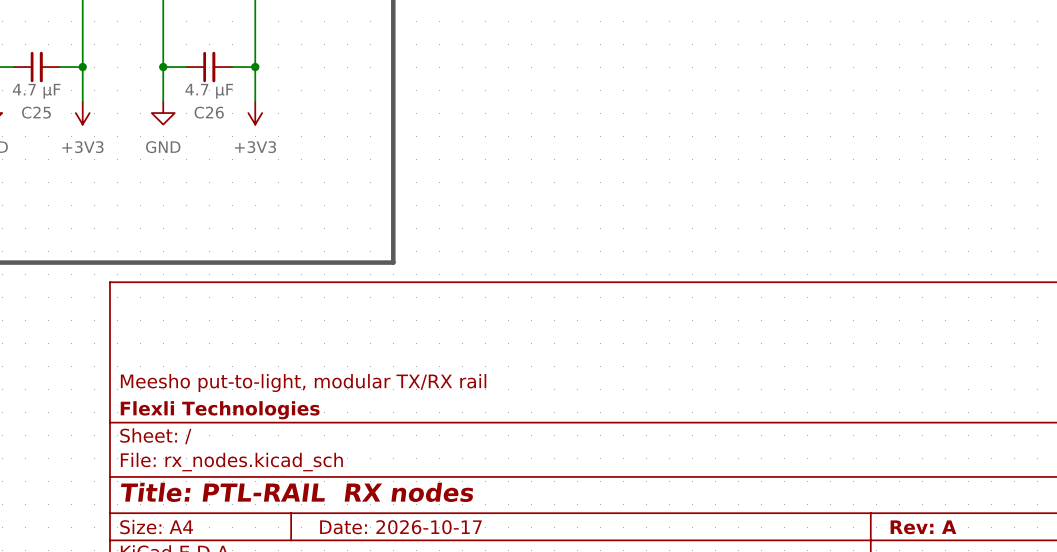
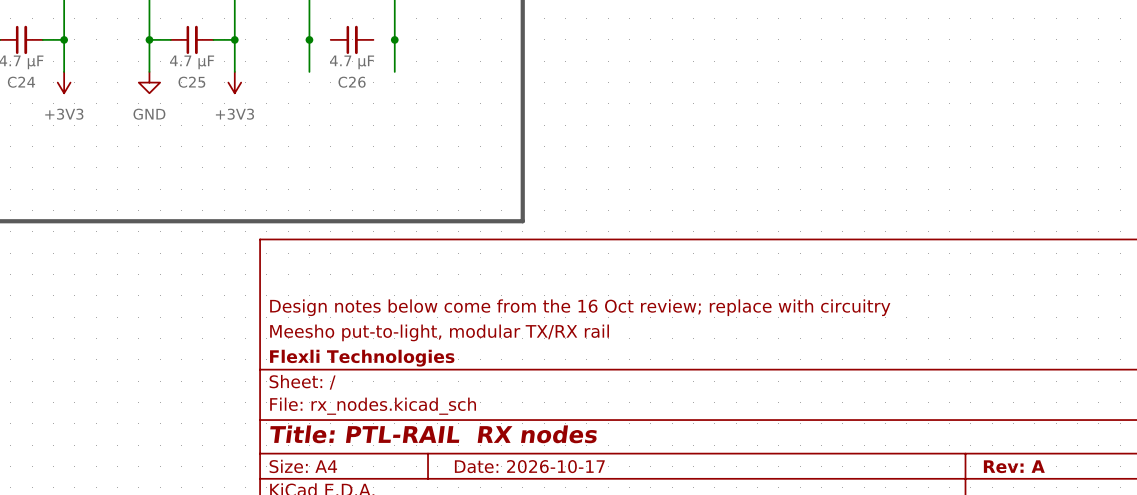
wire: (163, 67) (186, 67) -> none
wire: (232, 67) (255, 67) -> none
power symbol: GND (163, 113) -> none
power symbol: +3V3 (255, 113) -> none
title block: none -> Design notes below come from the 16 Oct review; replace with circuitry (580, 307)

